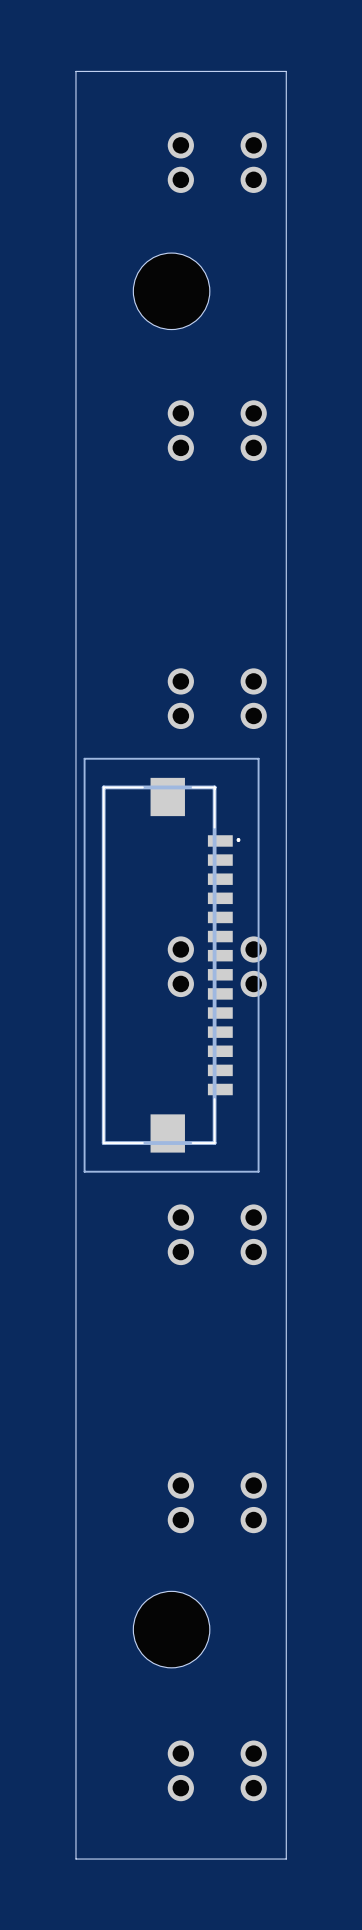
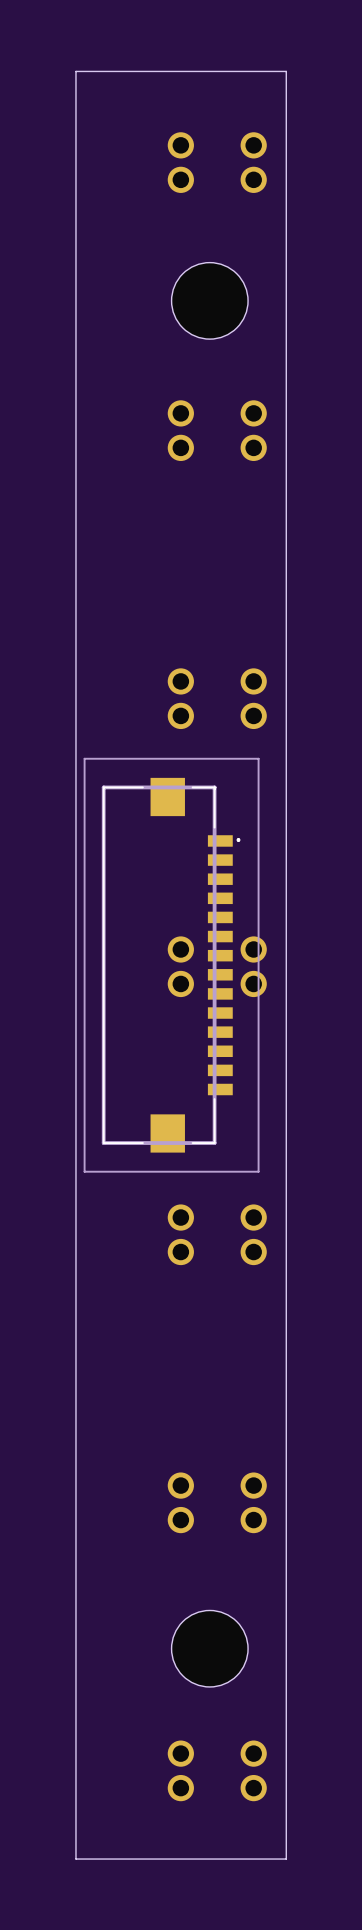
hole position: (171, 291) -> (209, 300)
hole position: (171, 1629) -> (209, 1648)

